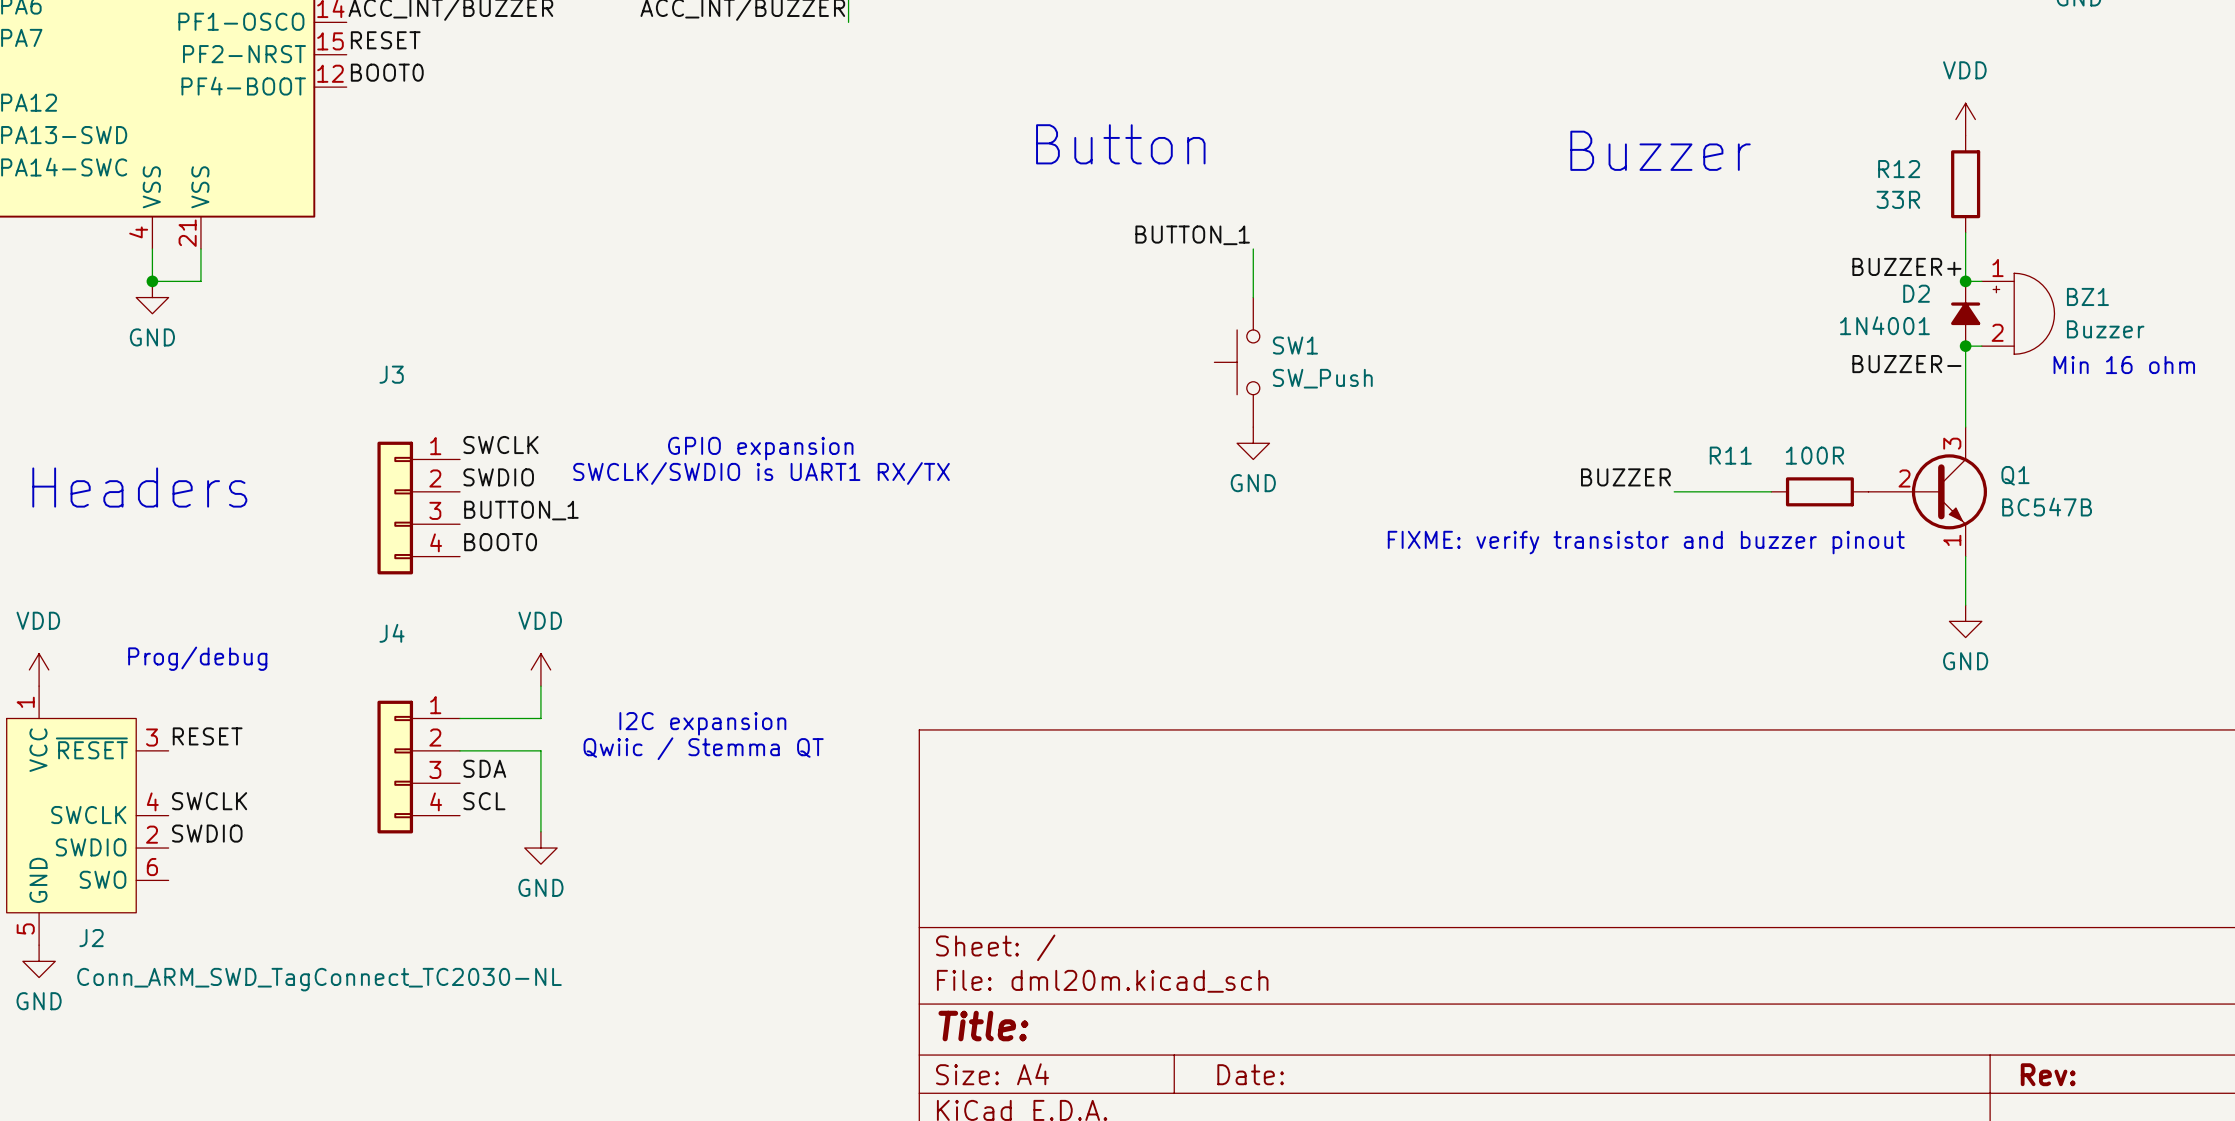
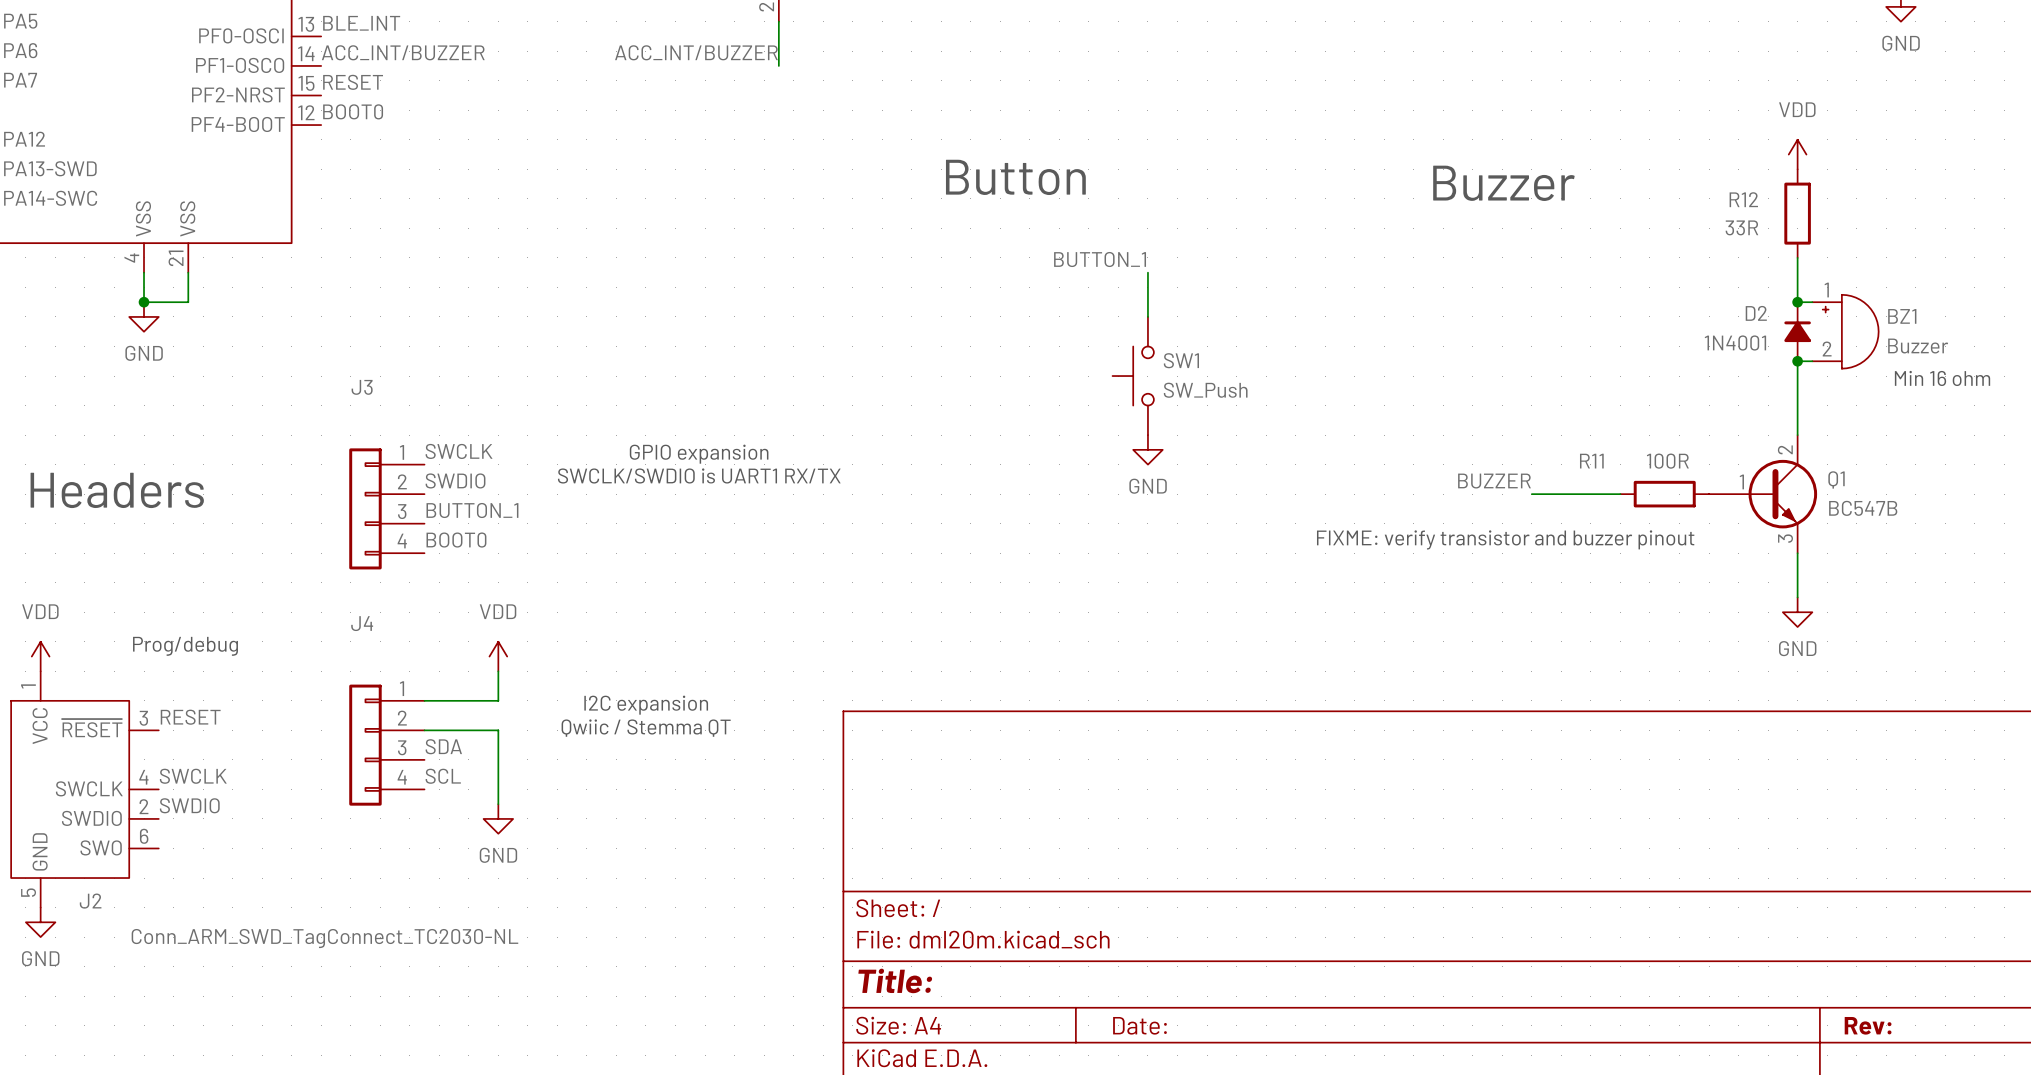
label: BUZZER+ (1906, 266) -> none
label: BUZZER- (1906, 364) -> none
Q1 pin number: 3 (1952, 443) -> 2 (1785, 449)
Q1 pin number: 2 (1904, 478) -> 1 (1741, 481)
Q1 pin number: 1 (1952, 540) -> 3 (1785, 538)

